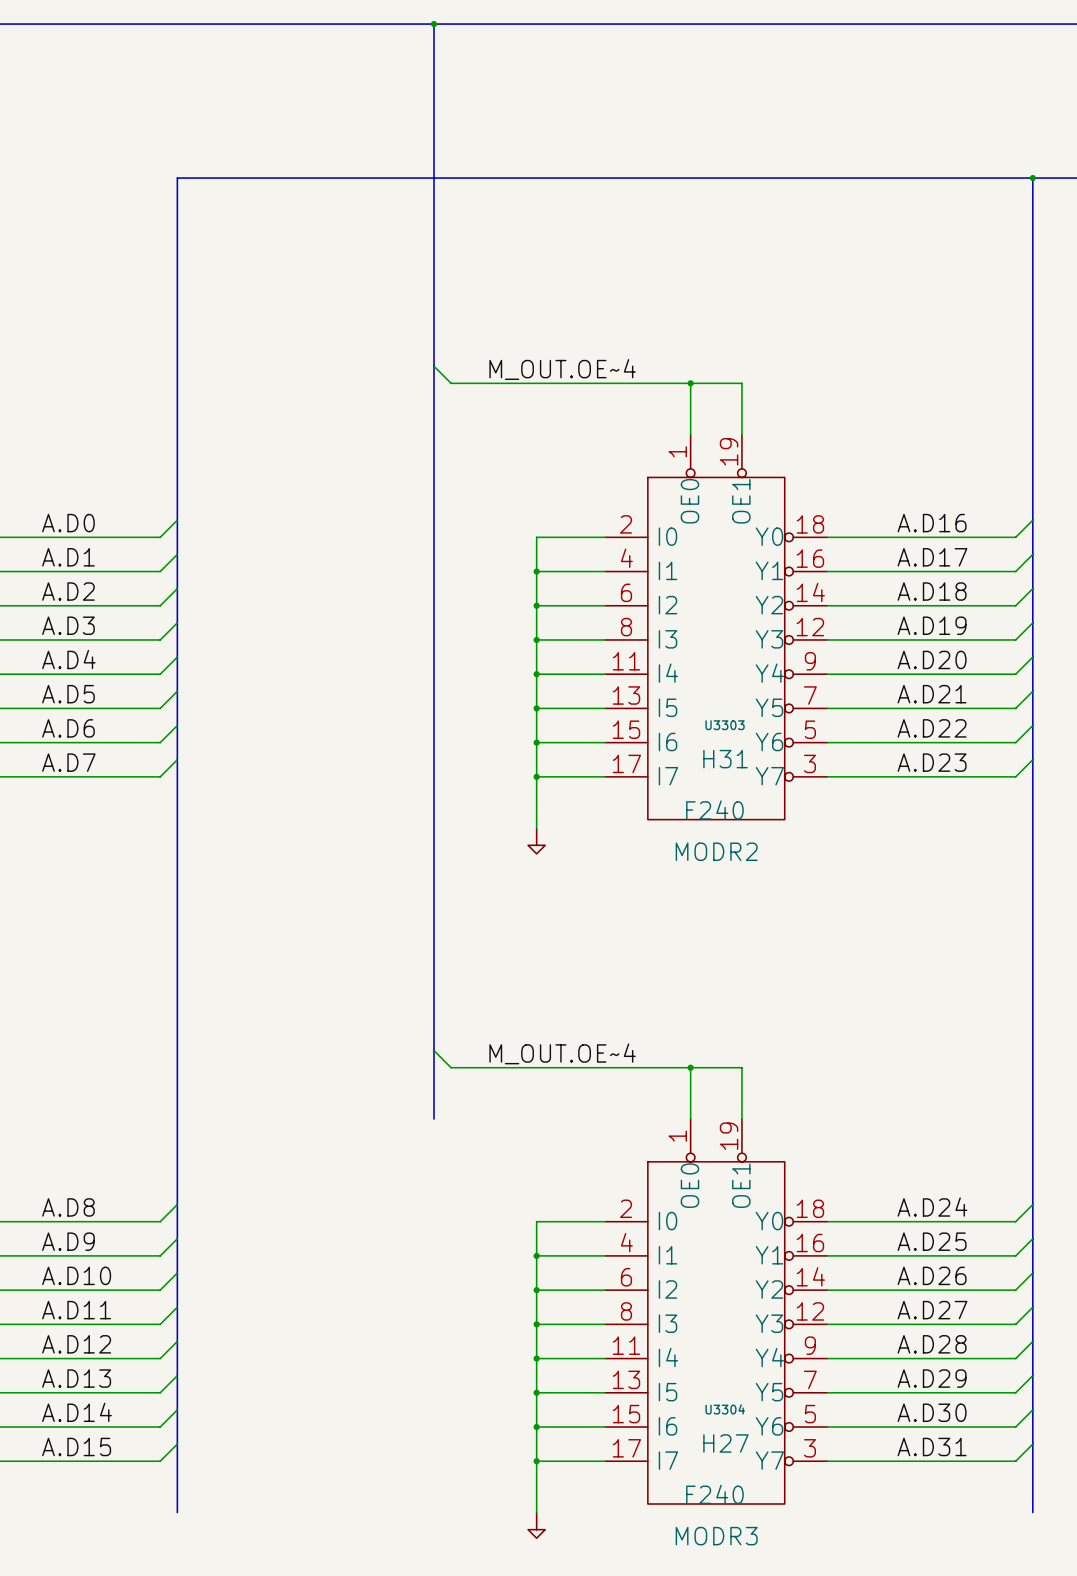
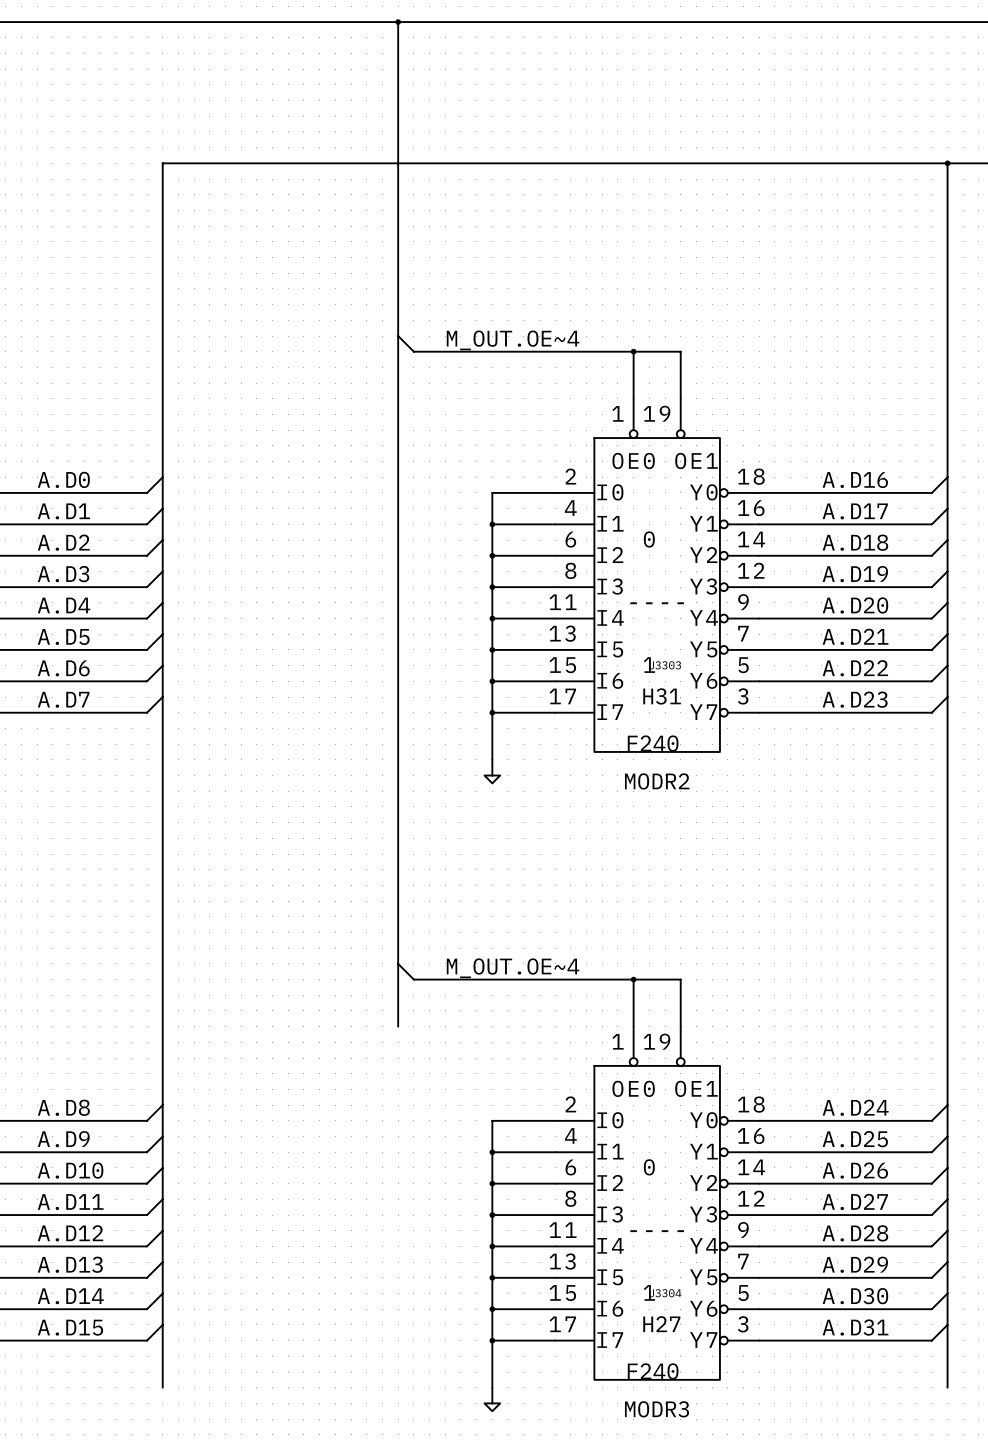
U3303 symbol: [605, 434, 828, 820] -> [555, 398, 760, 752]
U3304 symbol: [605, 1119, 828, 1505] -> [555, 1026, 760, 1380]

